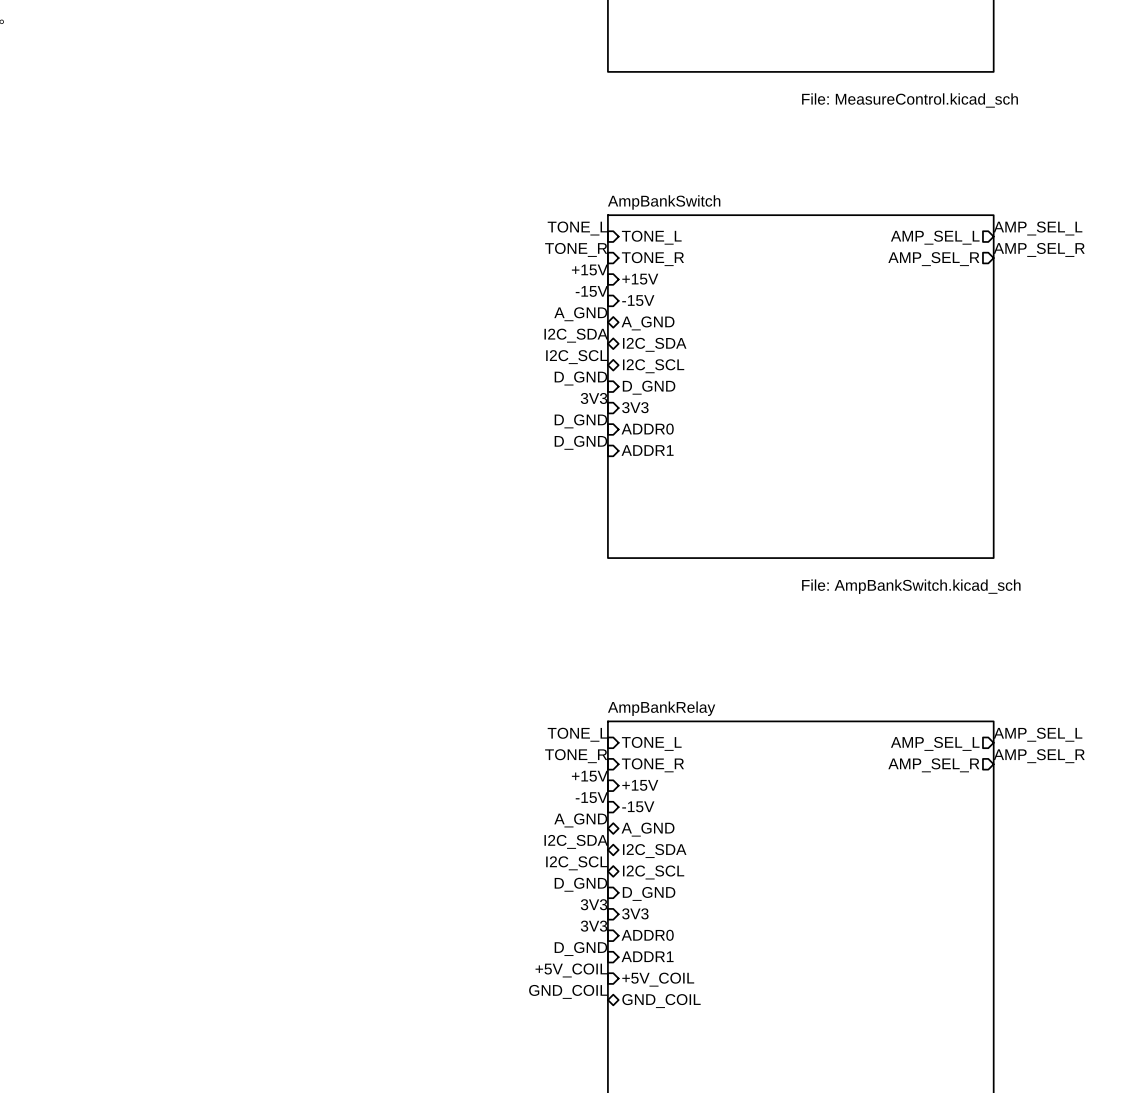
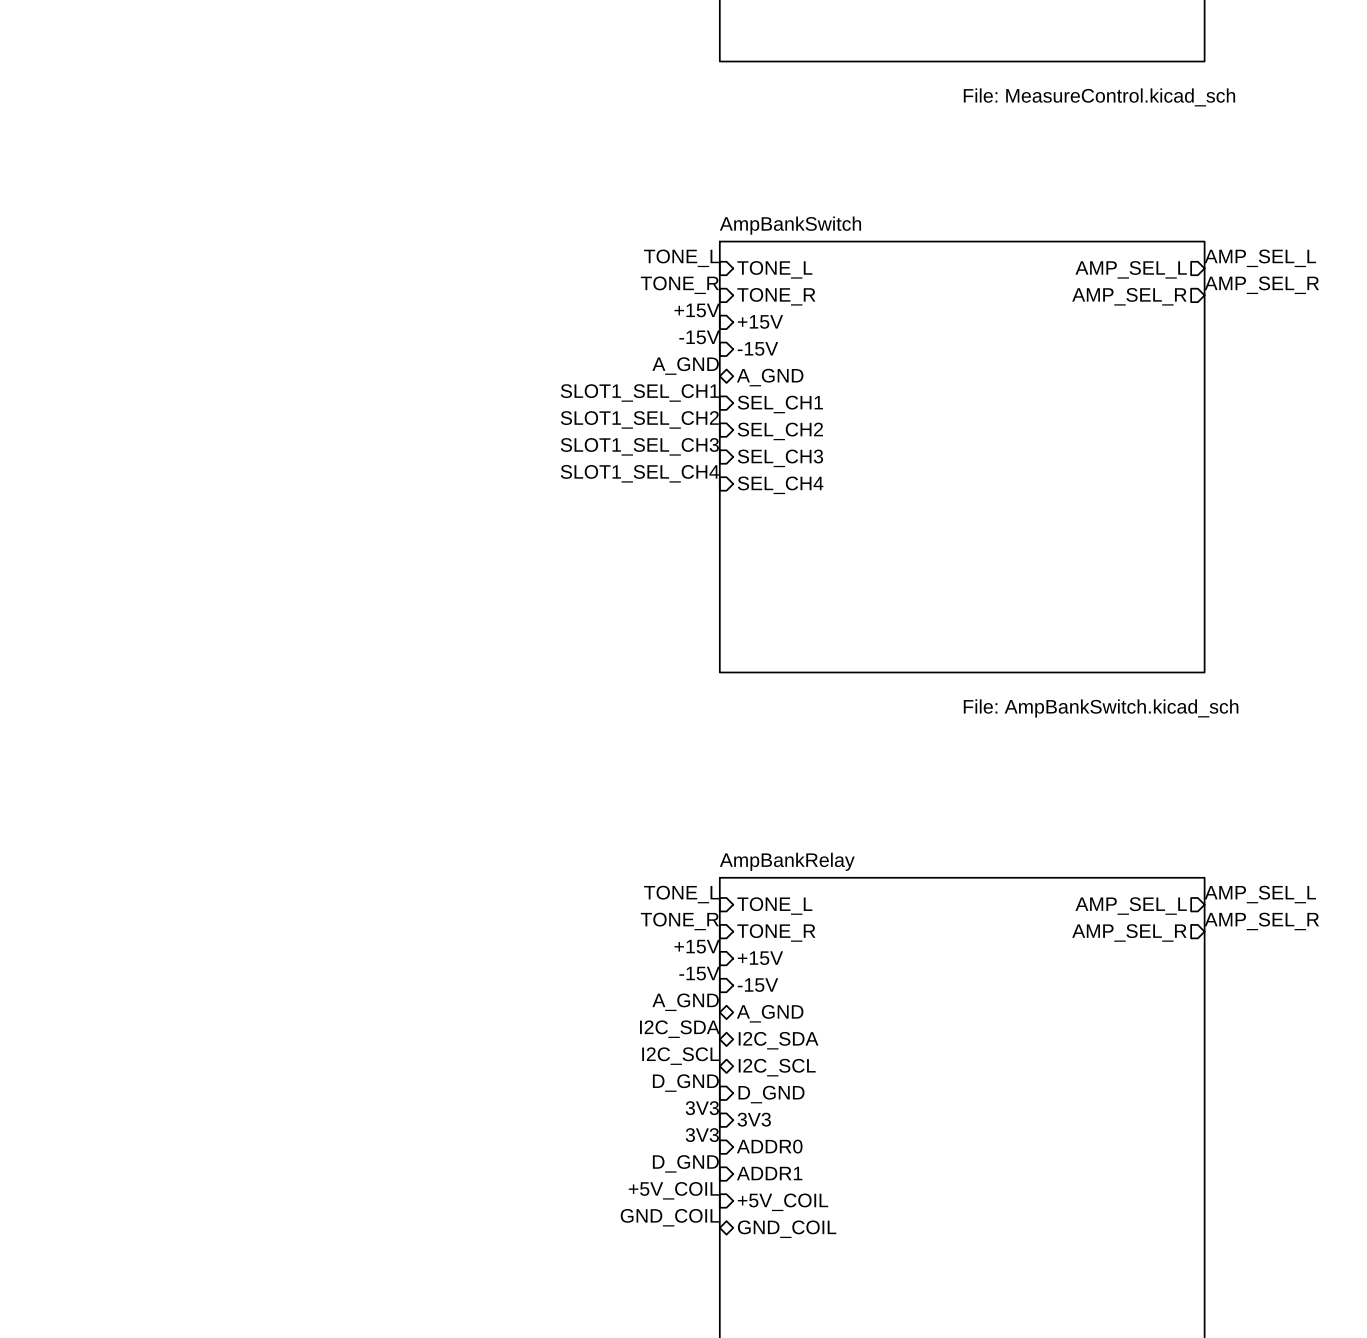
label: I2C_SDA (576, 335) -> SLOT1_SEL_CH1 (639, 392)
sheet pin shape: bidirectional (654, 344) -> input (780, 404)
sheet pin: I2C_SDA (654, 344) -> SEL_CH1 (780, 404)
label: I2C_SCL (576, 357) -> SLOT1_SEL_CH2 (639, 419)
sheet pin shape: bidirectional (653, 366) -> input (780, 431)
sheet pin: I2C_SCL (653, 366) -> SEL_CH2 (780, 431)
label: D_GND (580, 378) -> SLOT1_SEL_CH3 (639, 446)
sheet pin: D_GND (649, 387) -> SEL_CH3 (780, 458)
label: 3V3 (594, 398) -> SLOT1_SEL_CH4 (640, 473)
sheet pin: 3V3 (635, 407) -> SEL_CH4 (780, 485)
label: D_GND (580, 421) -> none
sheet pin: ADDR0 (647, 429) -> none
label: D_GND (580, 442) -> none
sheet pin: ADDR1 (647, 450) -> none

